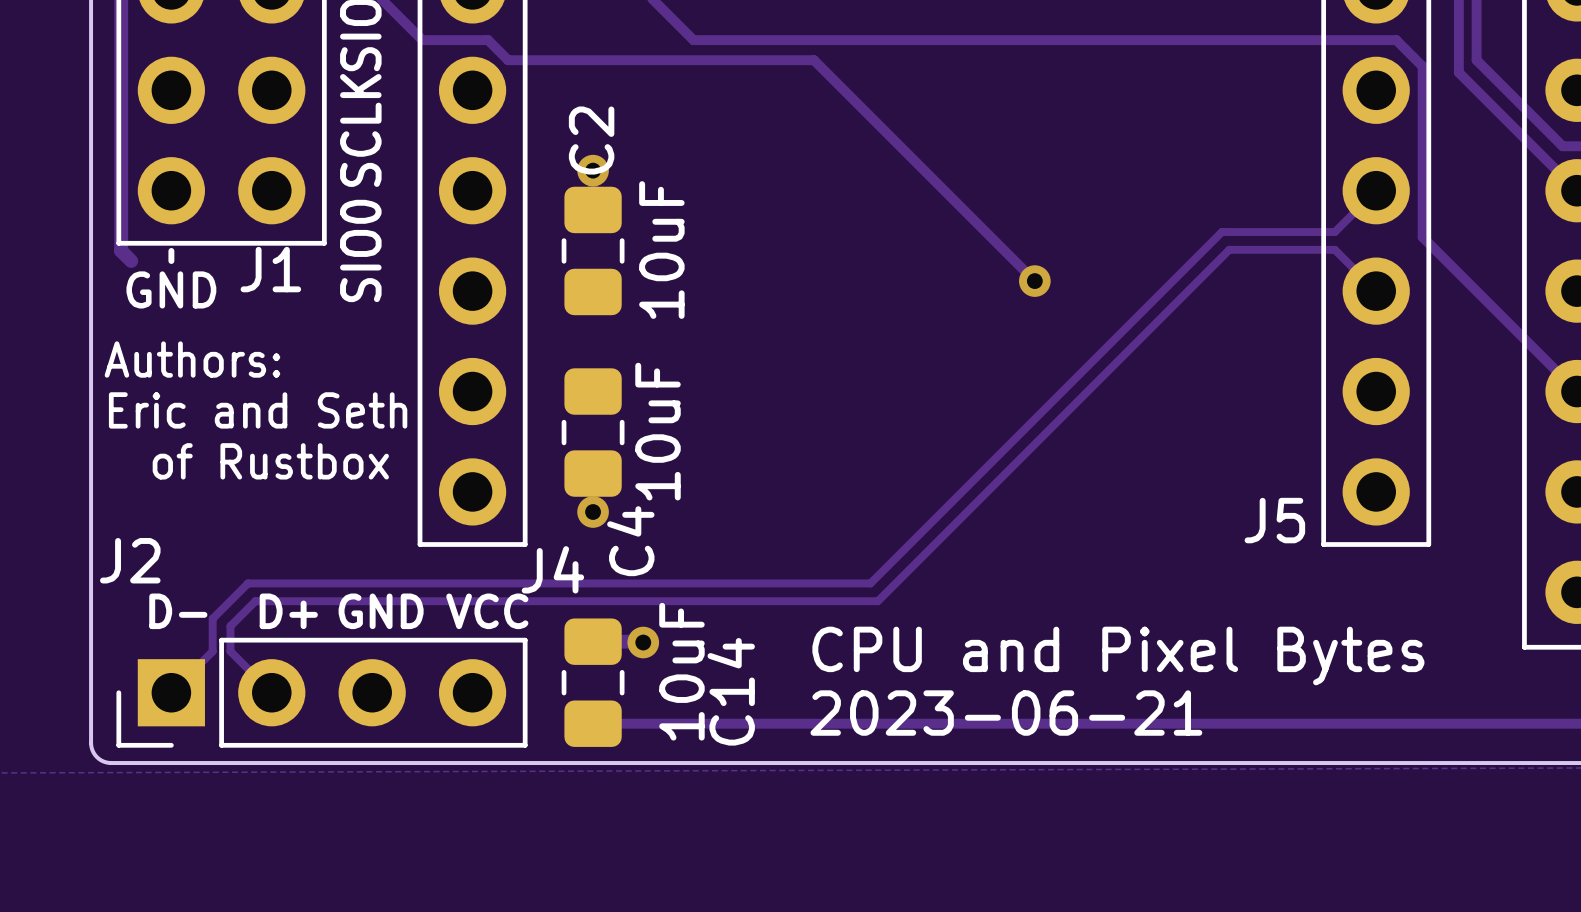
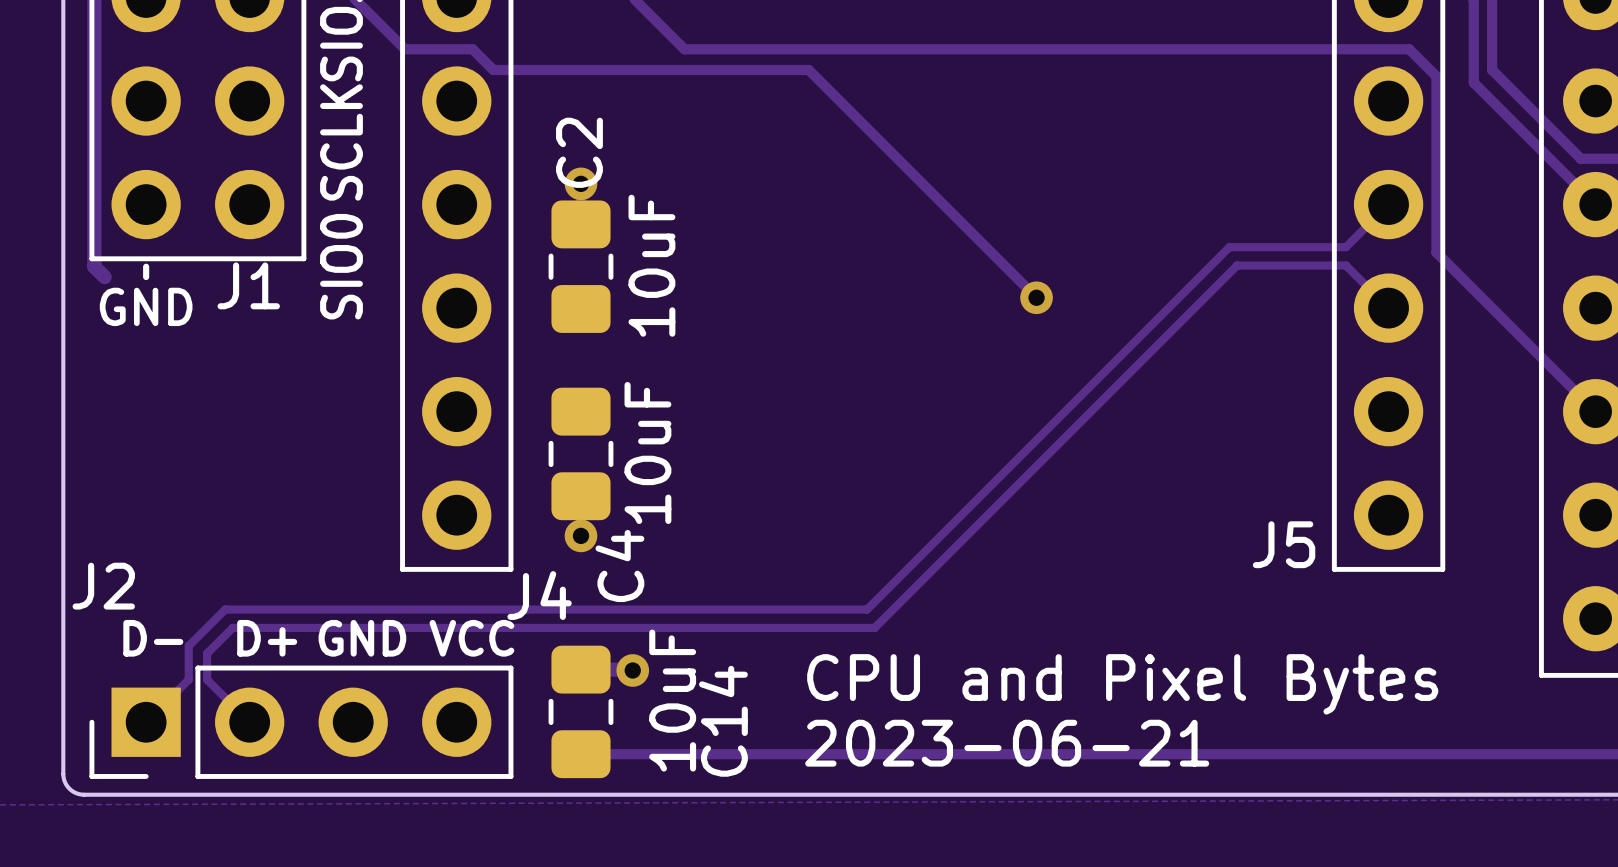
text: Authors: (192, 359) -> none
text: Eric and Seth (258, 410) -> none
text: of Rustbox (270, 461) -> none

